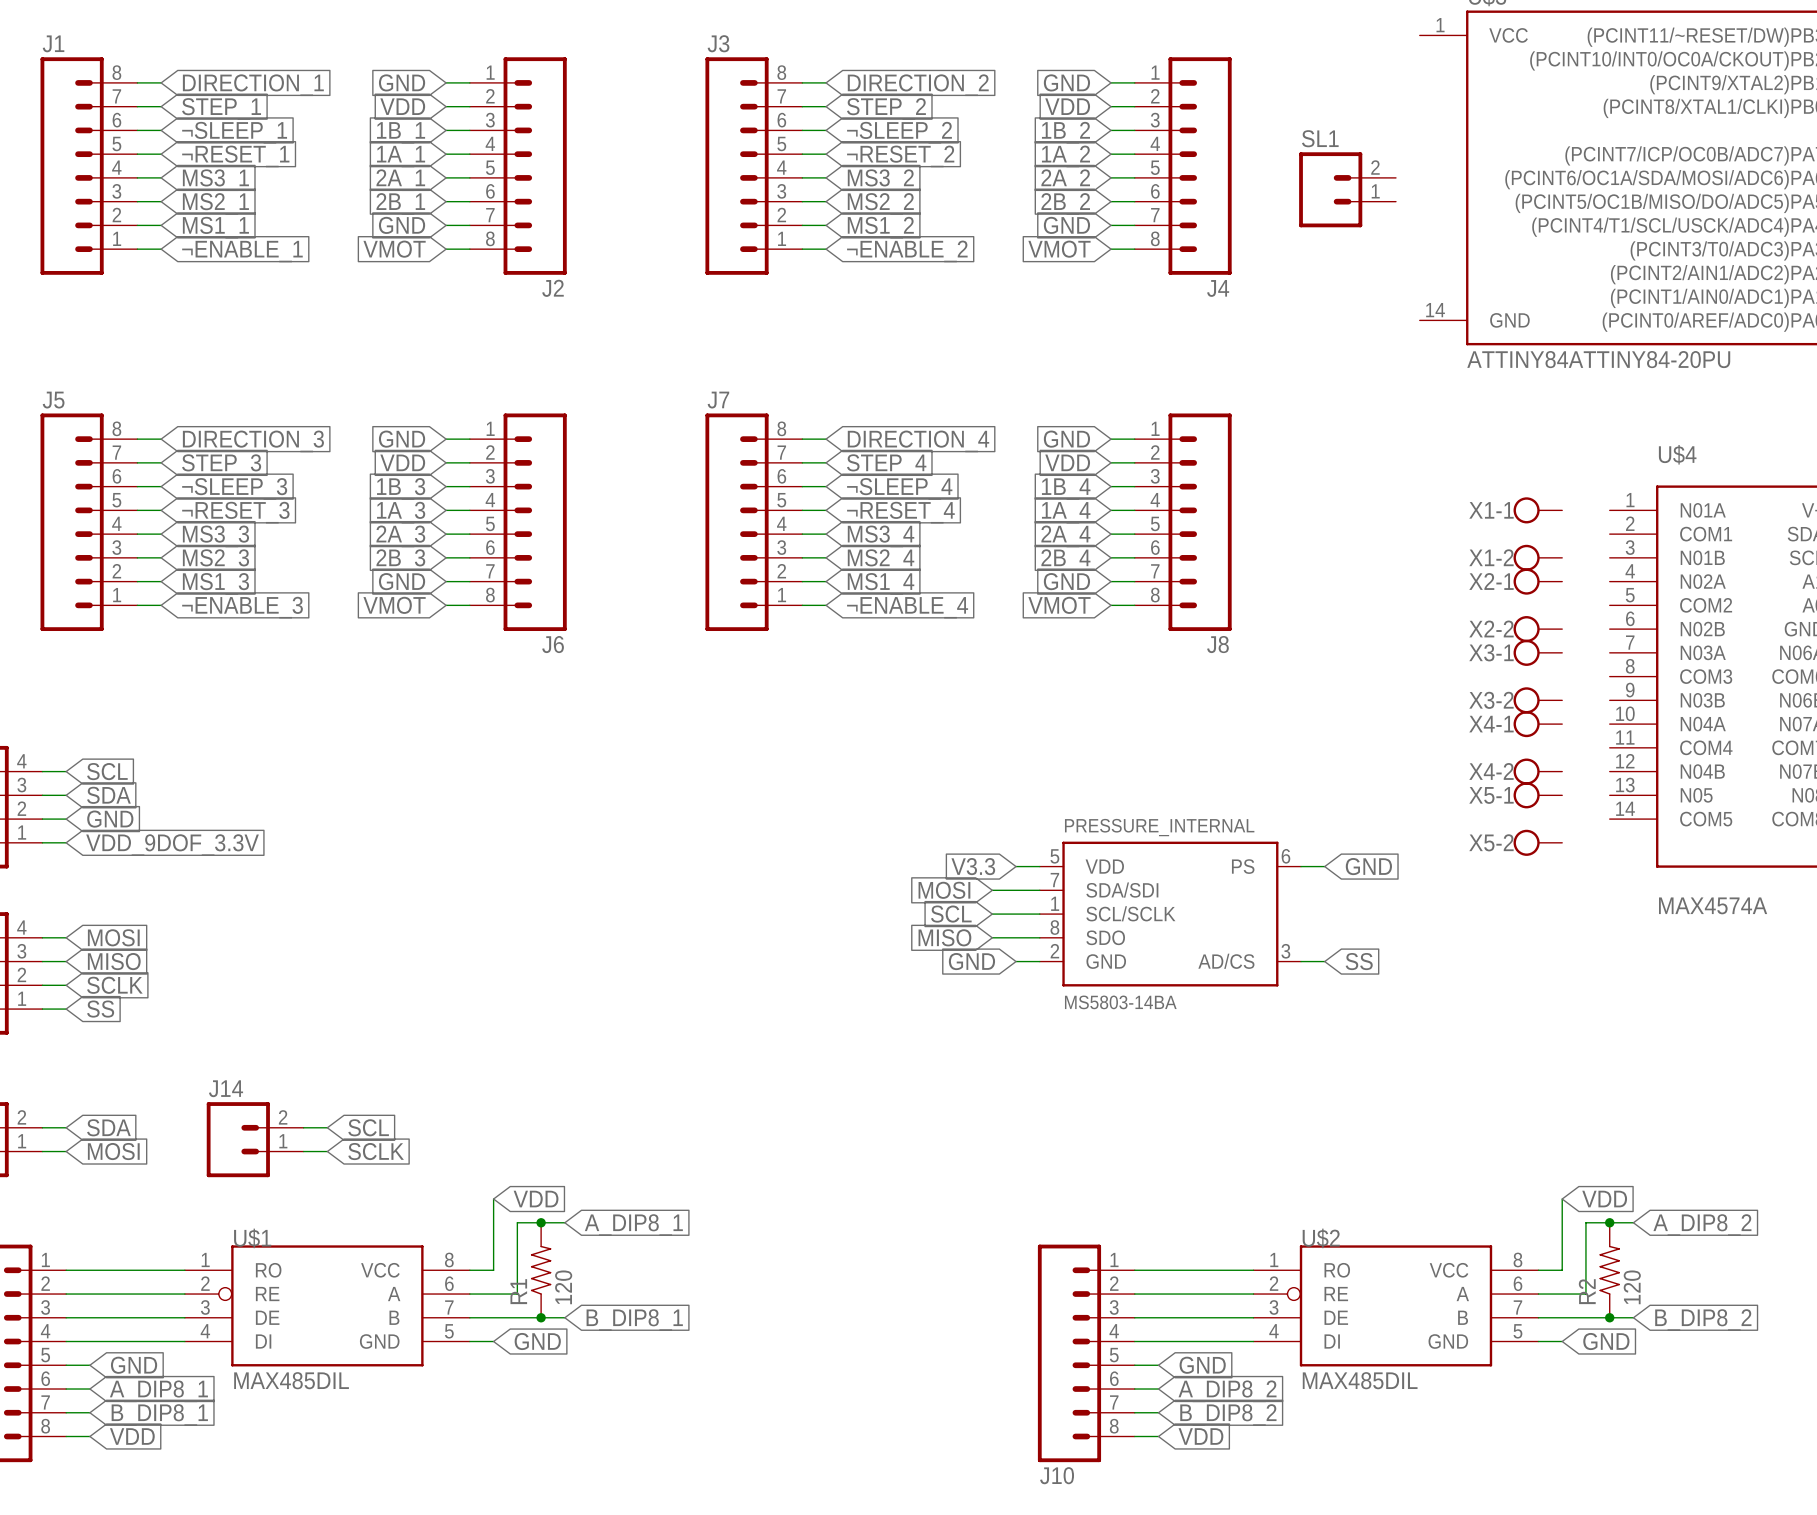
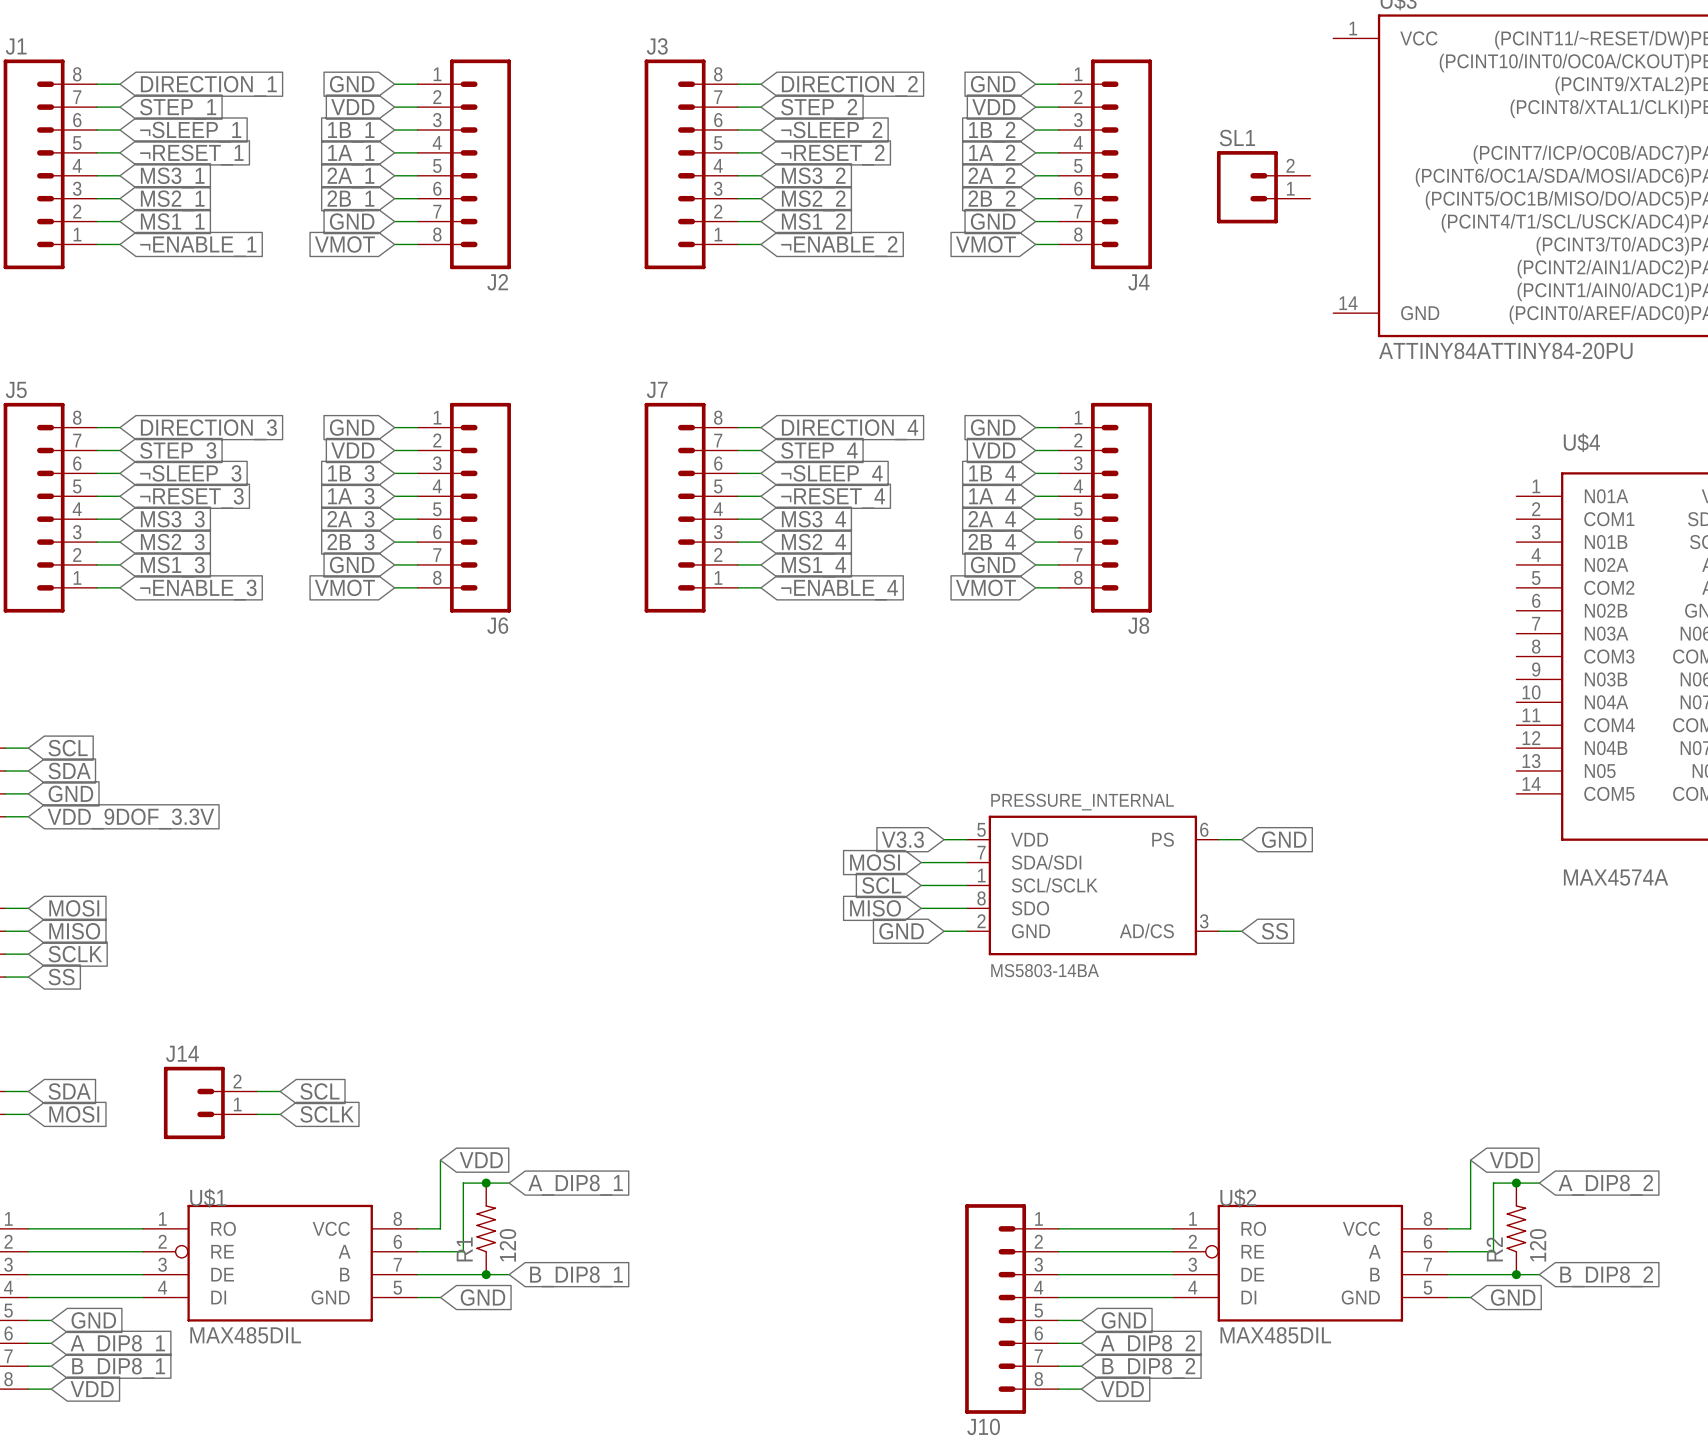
X1-1: (1537, 510) -> none
X1-2: (1537, 557) -> none
X2-1: (1537, 581) -> none
X2-2: (1537, 629) -> none
X3-1: (1537, 652) -> none
X3-2: (1537, 700) -> none
X4-1: (1537, 724) -> none
X4-2: (1537, 771) -> none
X5-1: (1537, 795) -> none
X5-2: (1537, 842) -> none

